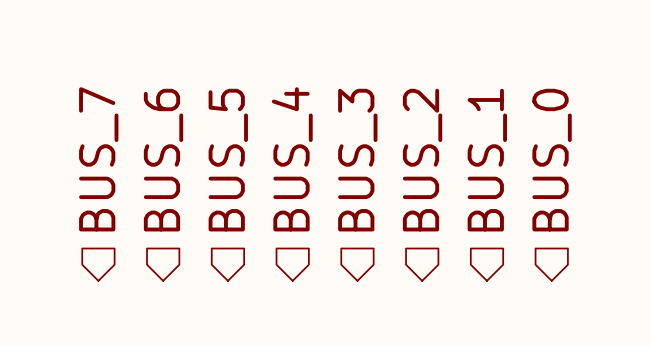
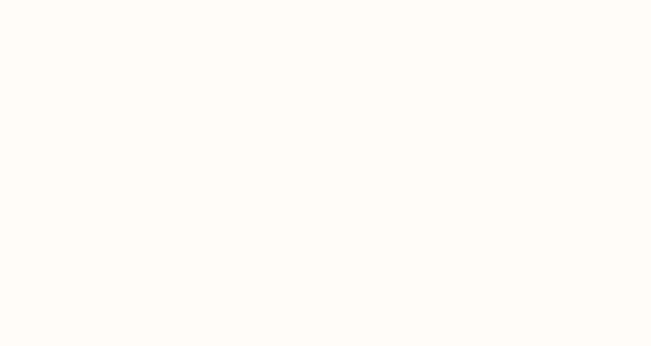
hierarchical label: BUS_7 (98, 159) -> none
hierarchical label: BUS_4 (292, 159) -> none
hierarchical label: BUS_6 (163, 160) -> none
hierarchical label: BUS_5 (228, 160) -> none
hierarchical label: BUS_3 (357, 160) -> none
hierarchical label: BUS_2 (422, 160) -> none
hierarchical label: BUS_1 (487, 160) -> none
hierarchical label: BUS_0 (552, 160) -> none

